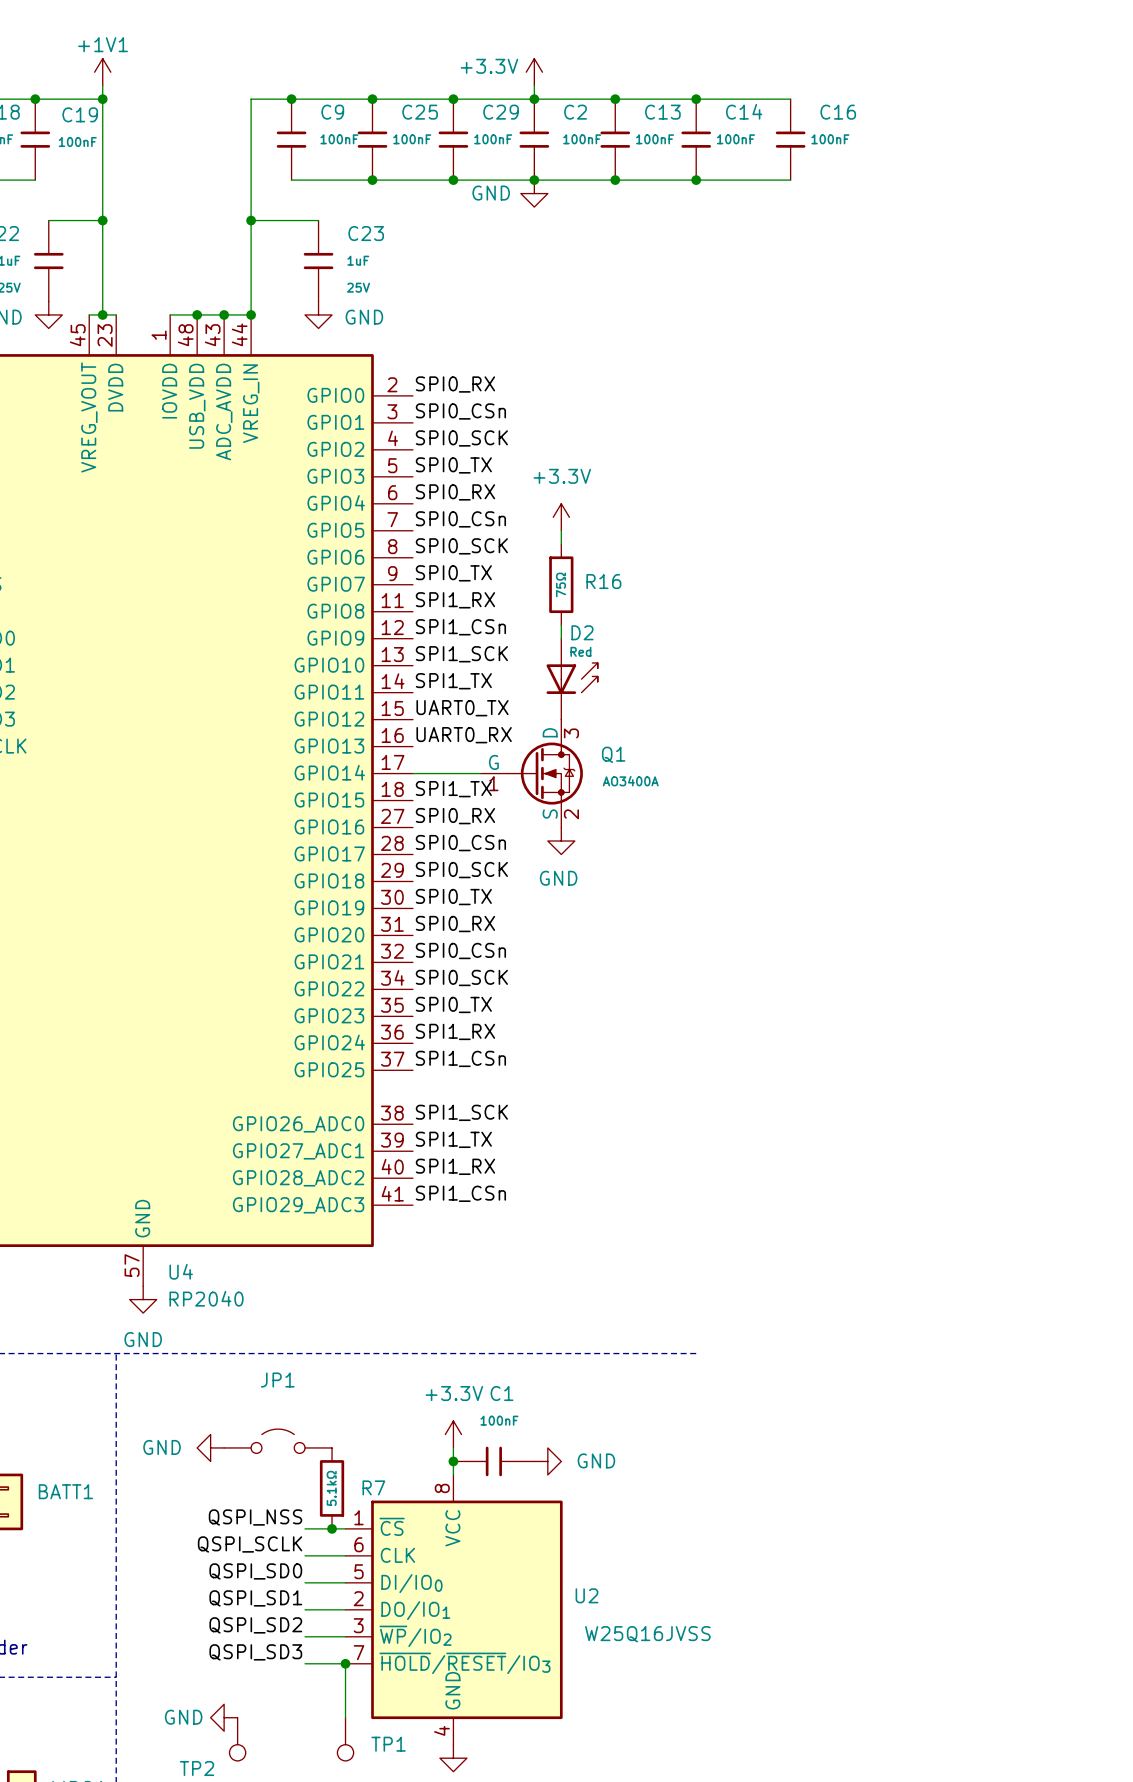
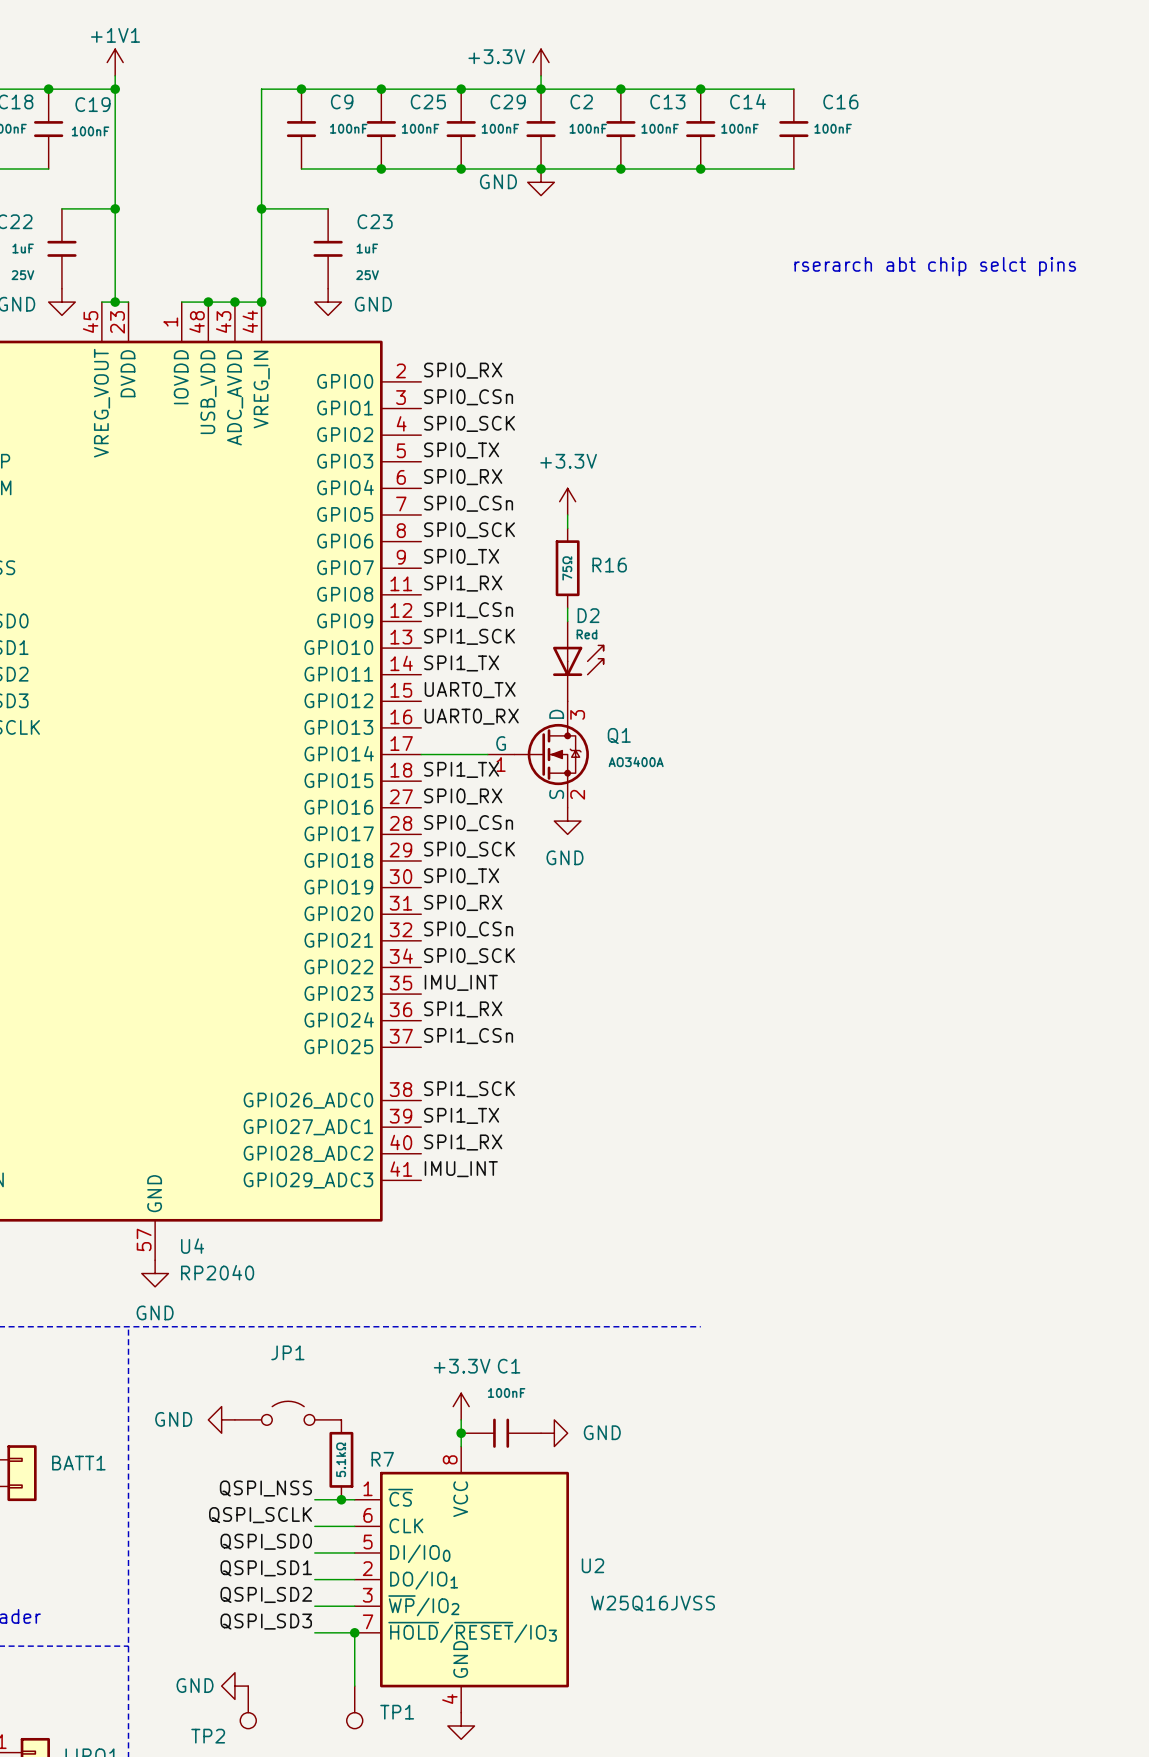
text: none -> rserarch abt chip selct pins (935, 266)
label: SPI0_TX (453, 1004) -> IMU_INT (461, 982)
label: SPI1_CSn (460, 1193) -> IMU_INT (461, 1169)

